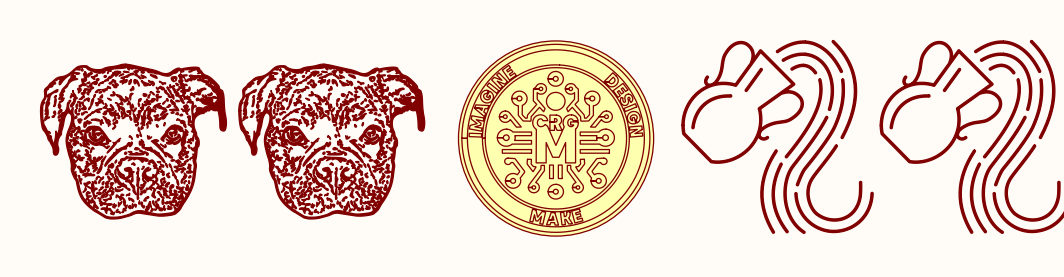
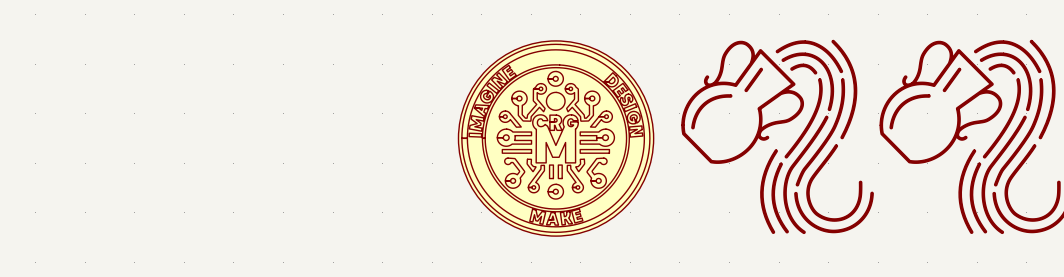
part: (133, 141) -> none
part: (331, 141) -> none

